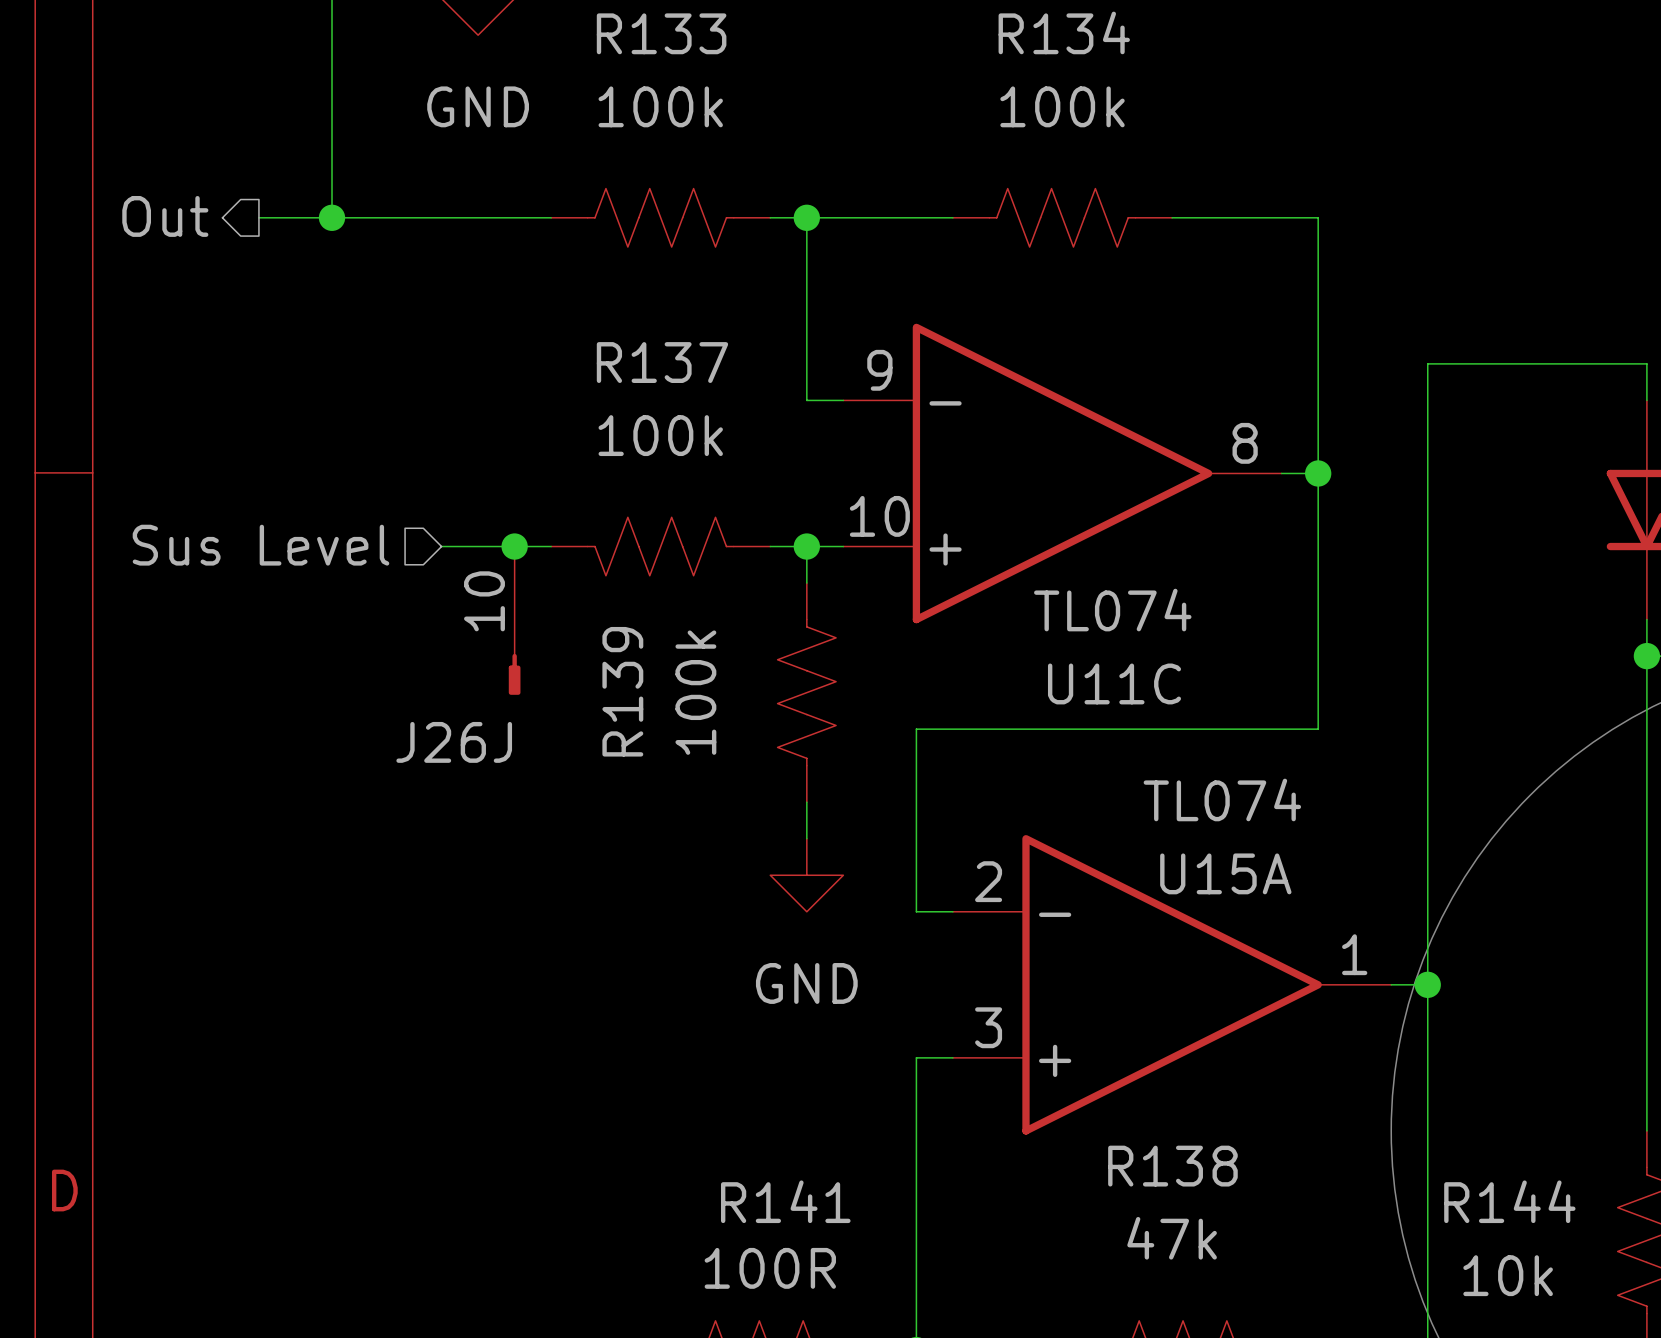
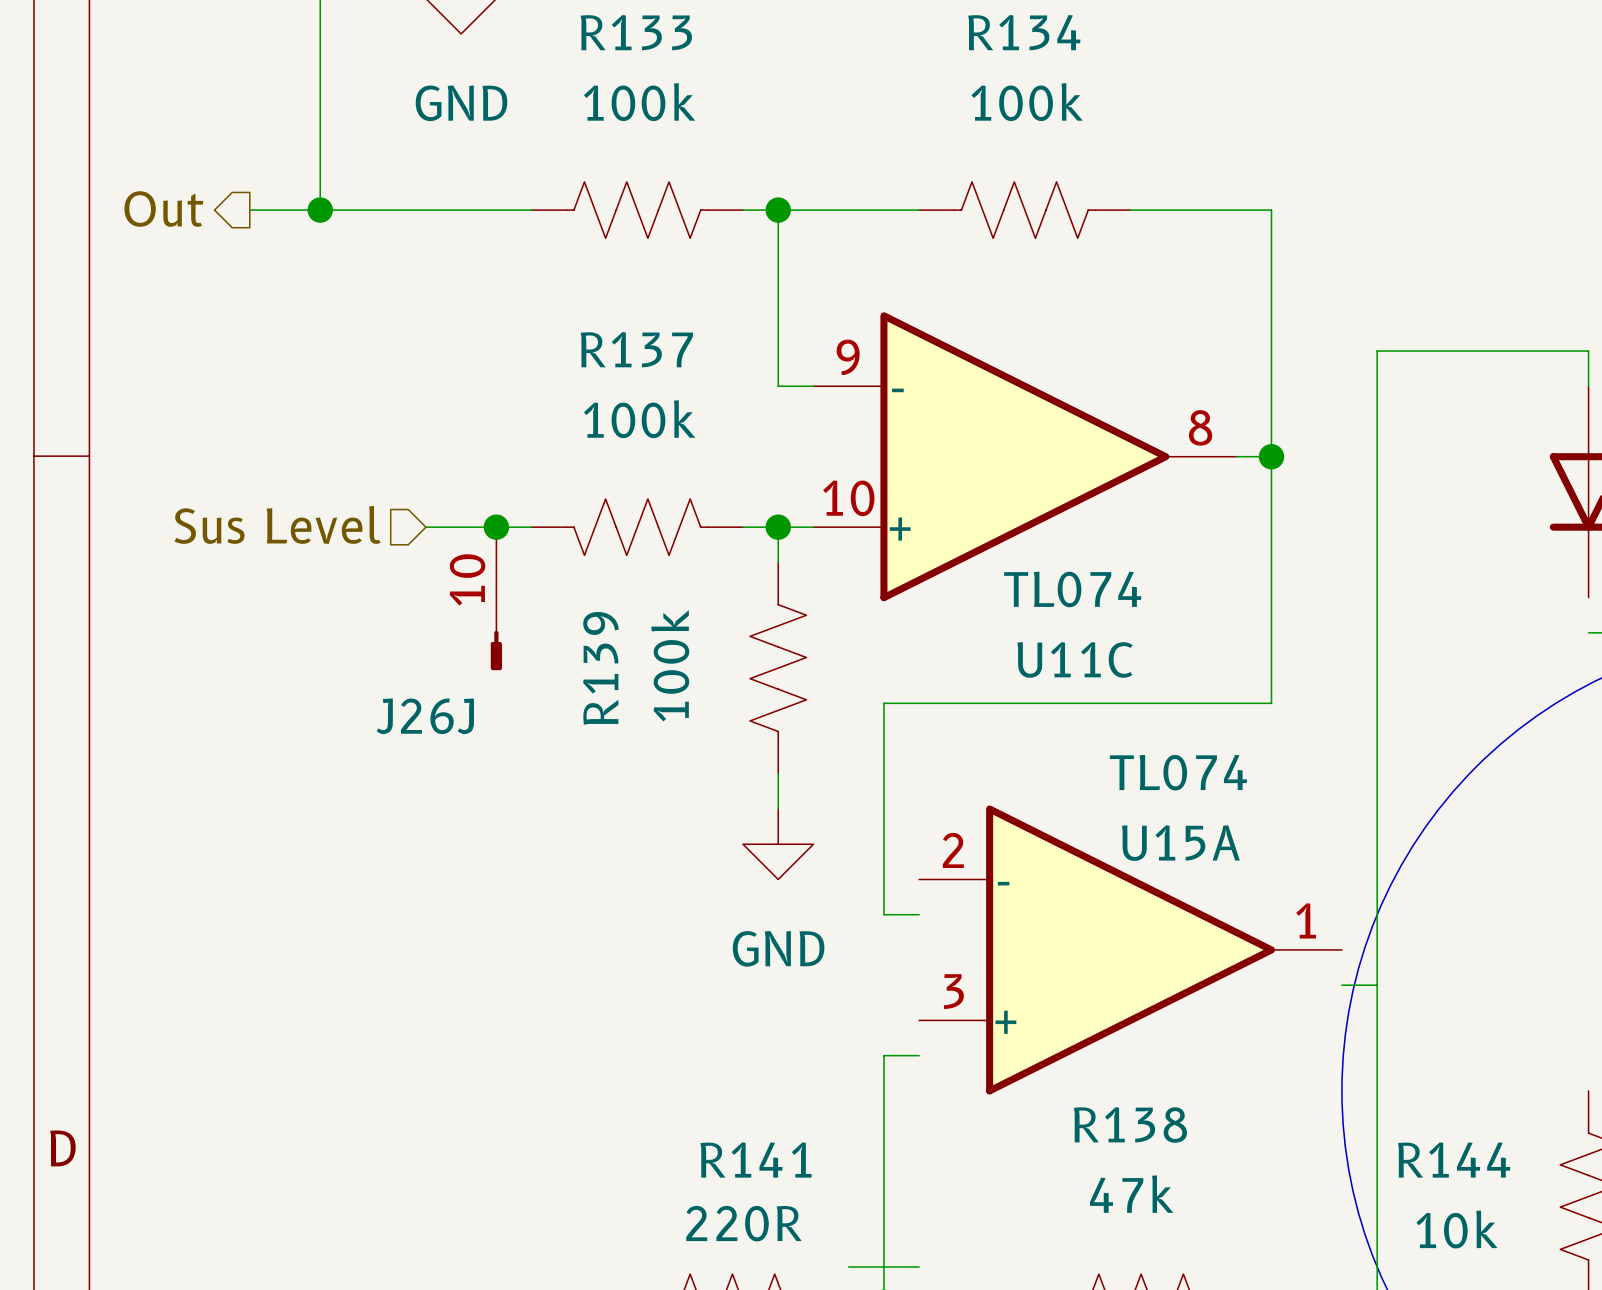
wire: (1646, 619) (1646, 1130) -> none
junction: (1646, 656) -> none
wire: (916, 911) (952, 911) -> (883, 879) (883, 914) (919, 914)
wire: (1391, 984) (1427, 984) -> (1341, 985) (1377, 985)
junction: (1427, 984) -> none
wire: (952, 1057) (916, 1057) (916, 1094) -> (919, 1055) (883, 1055)
R141 value: 100R (770, 1268) -> 220R (744, 1223)
wire: none -> (848, 1267) (919, 1267)

